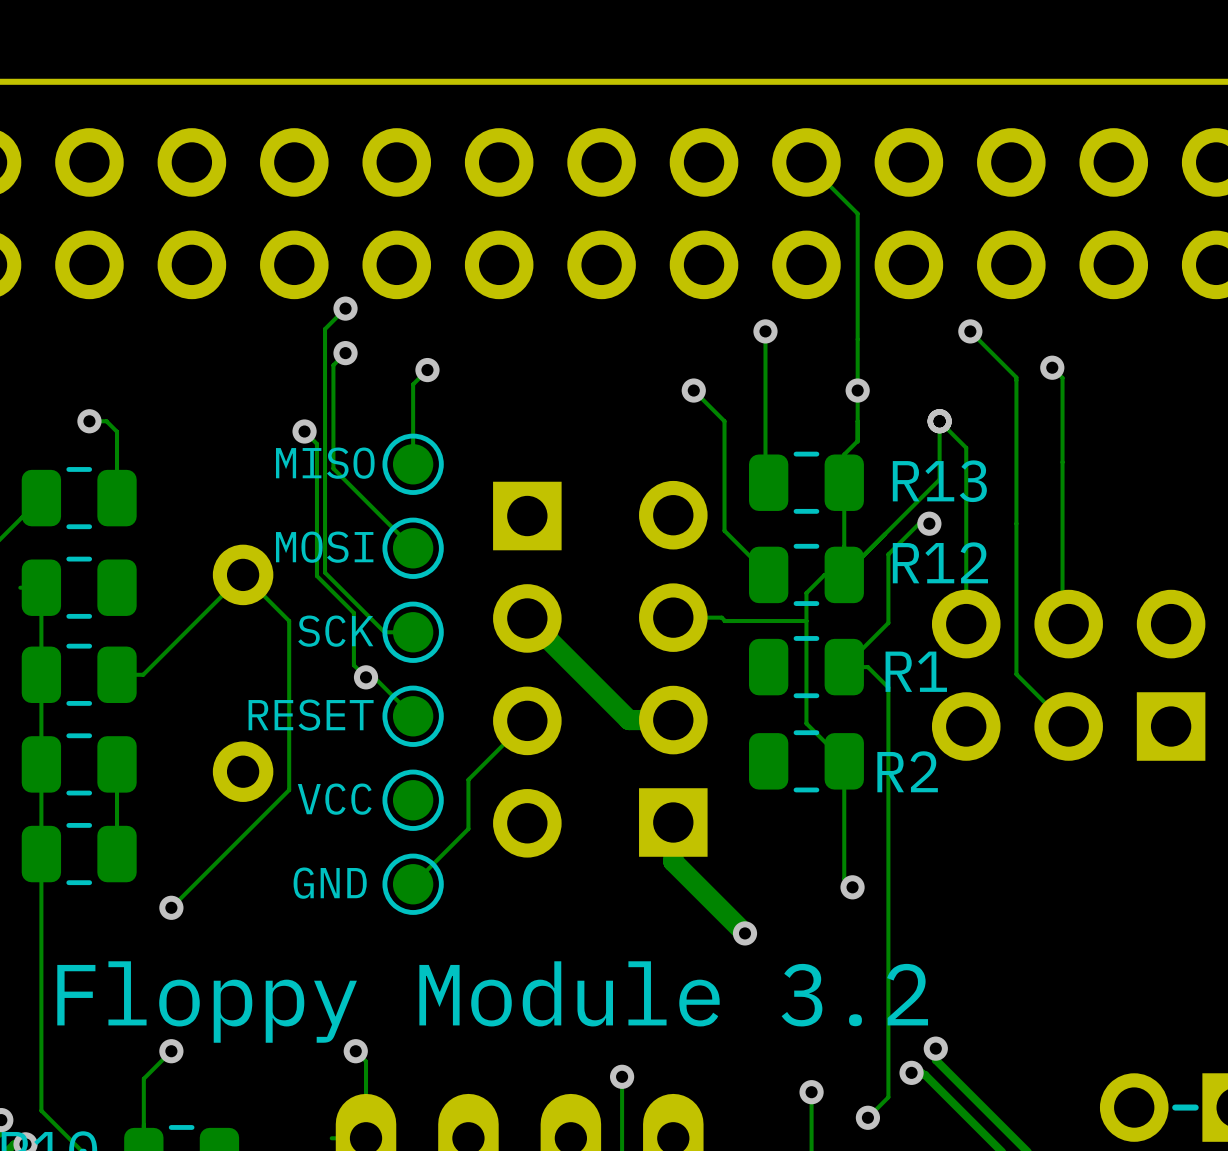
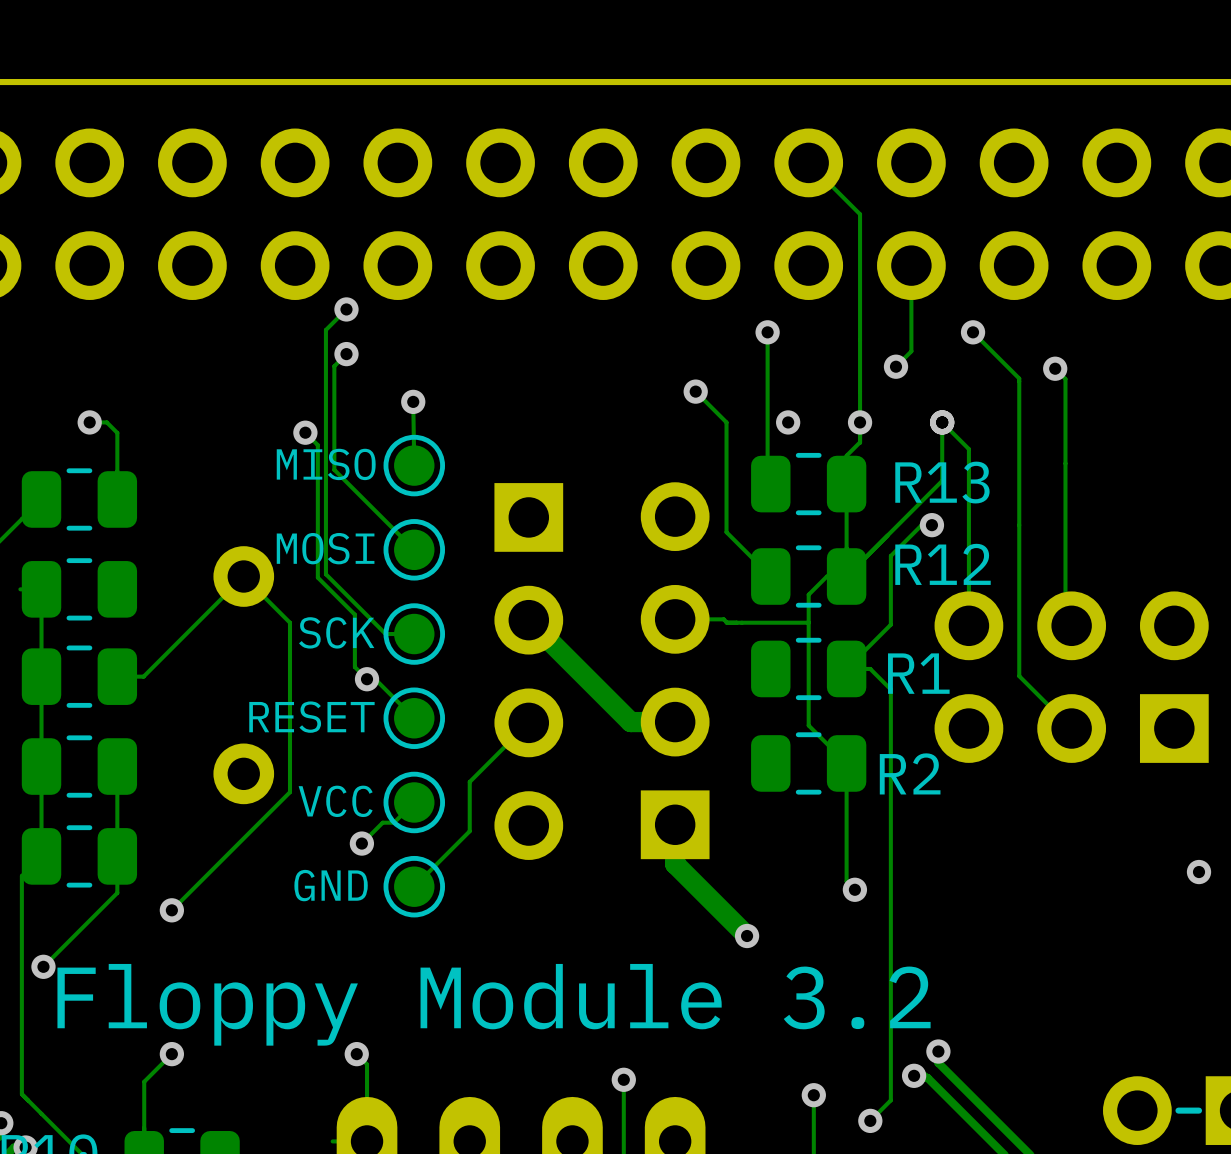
track: none -> (911, 265) (911, 351) (896, 366)
via: none -> (896, 366)
track: (427, 370) (413, 384) (413, 464) -> (413, 401) (414, 465)
via position: (427, 370) -> (413, 401)
via: (857, 390) -> none
via: none -> (788, 422)
via: none -> (860, 422)
track: none -> (414, 802) (394, 822) (382, 822) (361, 843)
via: none -> (361, 843)
track: (41, 854) (41, 1110) -> (41, 856) (21, 876) (21, 1094) (41, 1113)
track: none -> (117, 856) (117, 892) (43, 966)
via: none -> (1199, 872)
via: none -> (43, 966)

